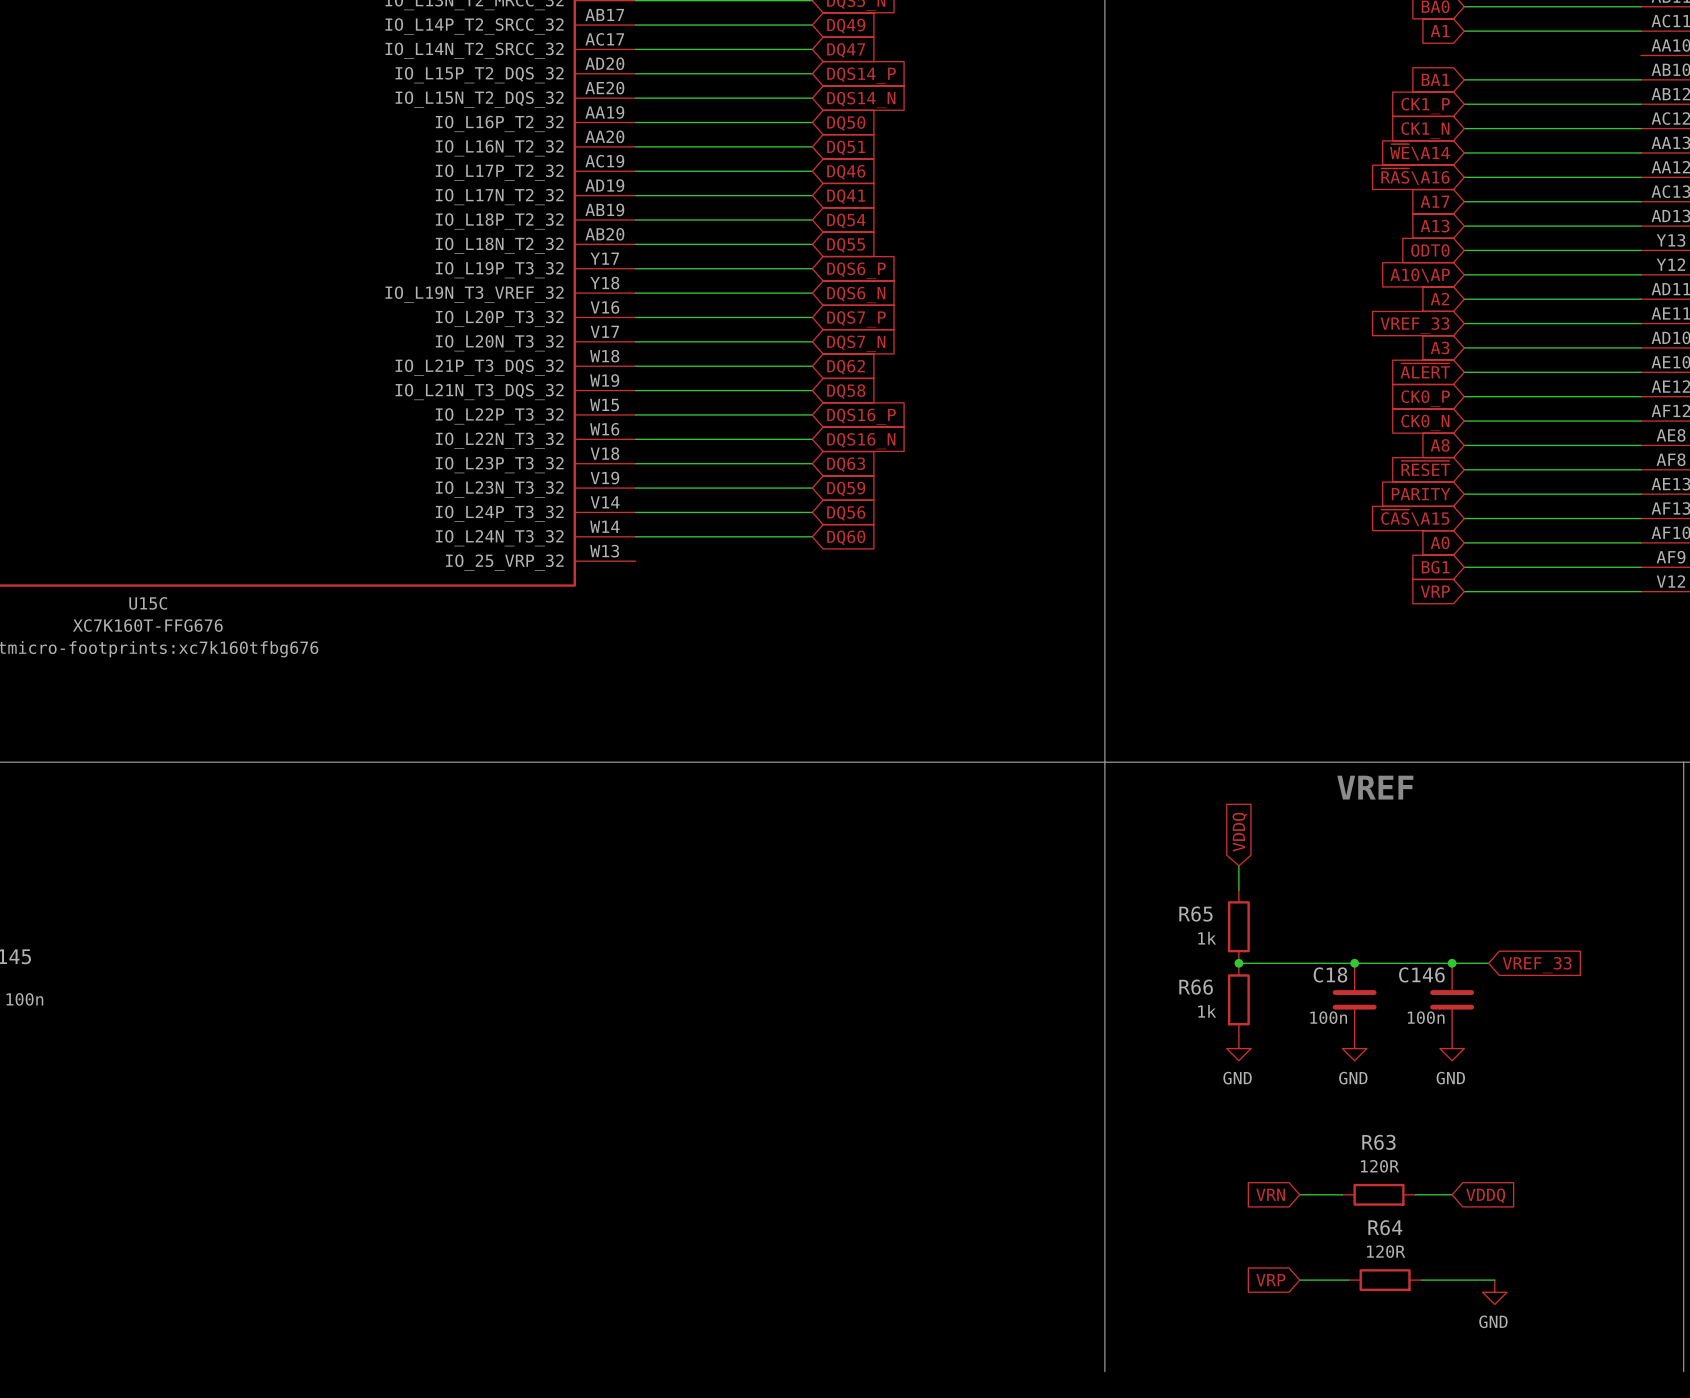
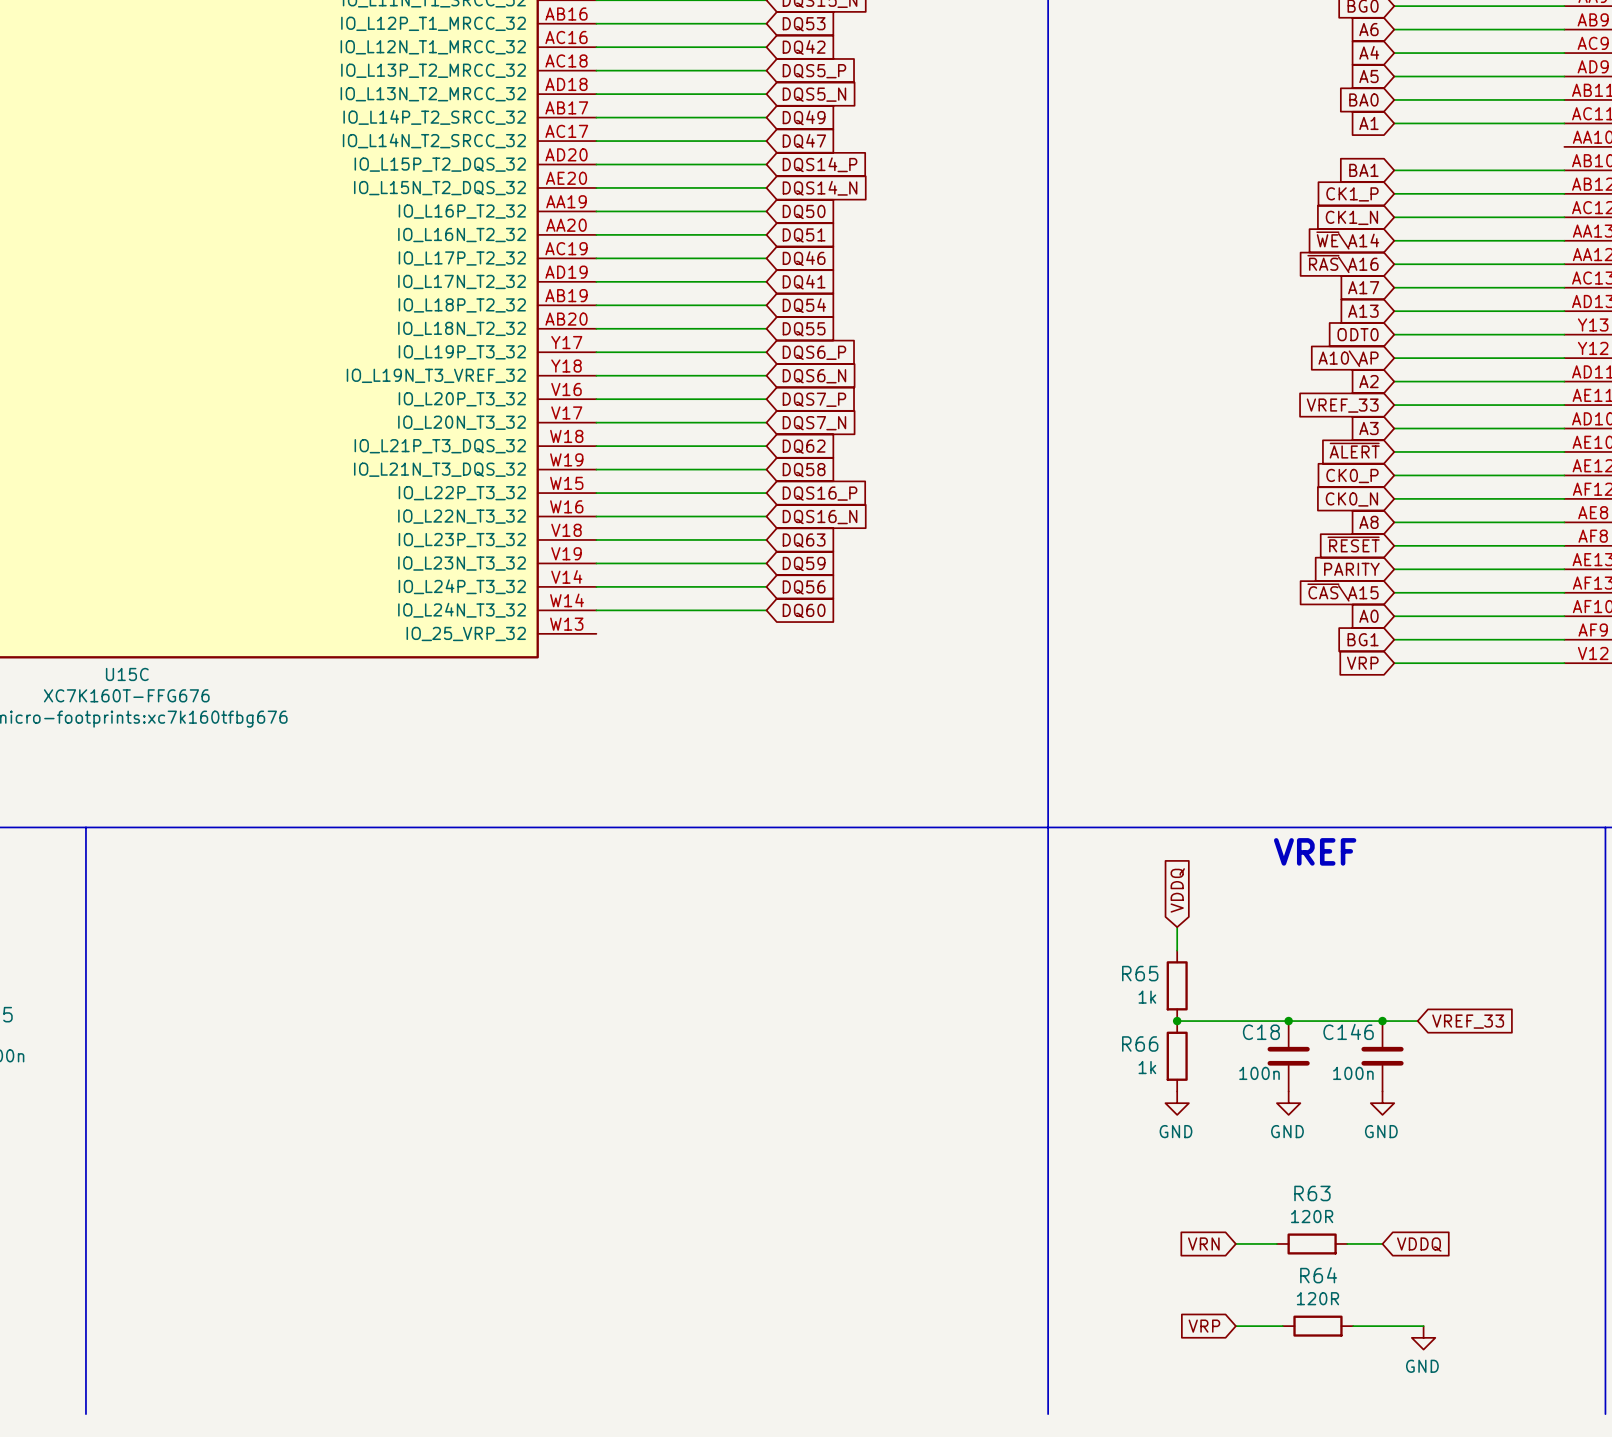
line: none -> (85, 827) (85, 1414)

